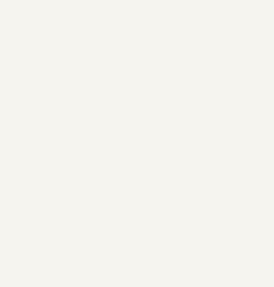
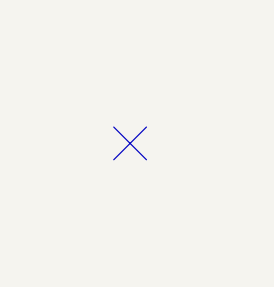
no-connect mark: none -> (130, 143)

